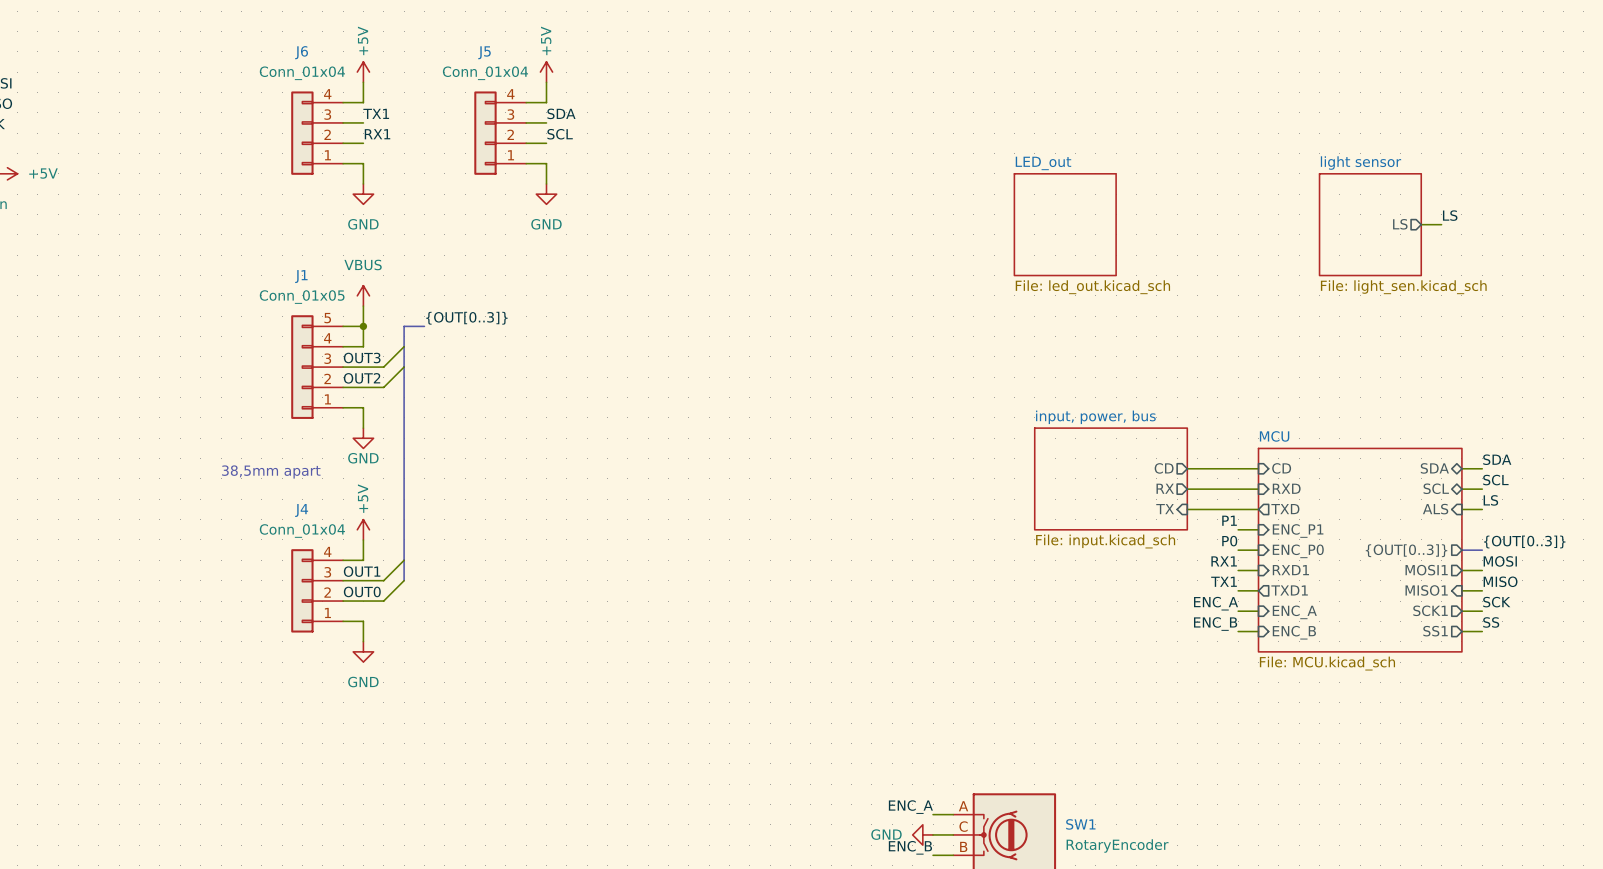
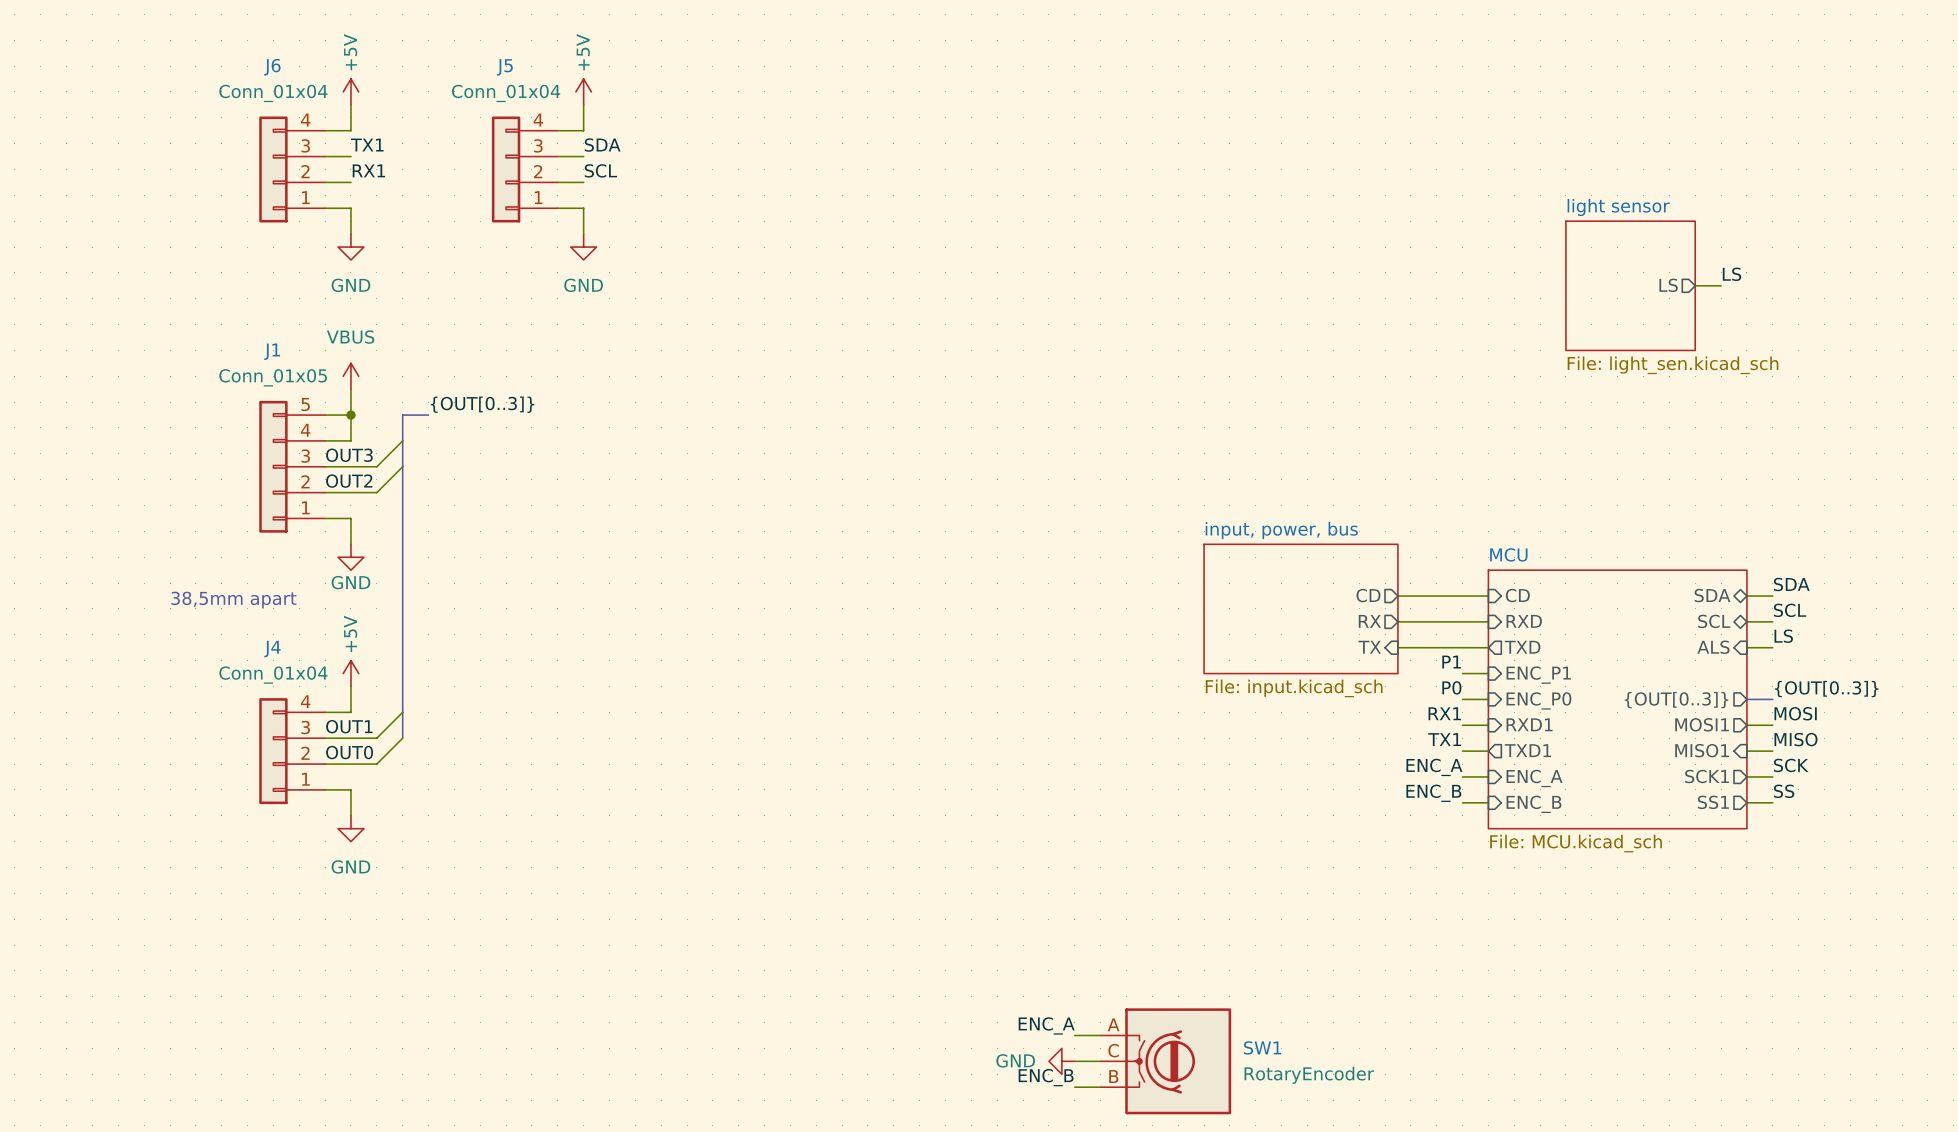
sheet LED_out: File: led_out.kicad_sch (1065, 224) -> none

